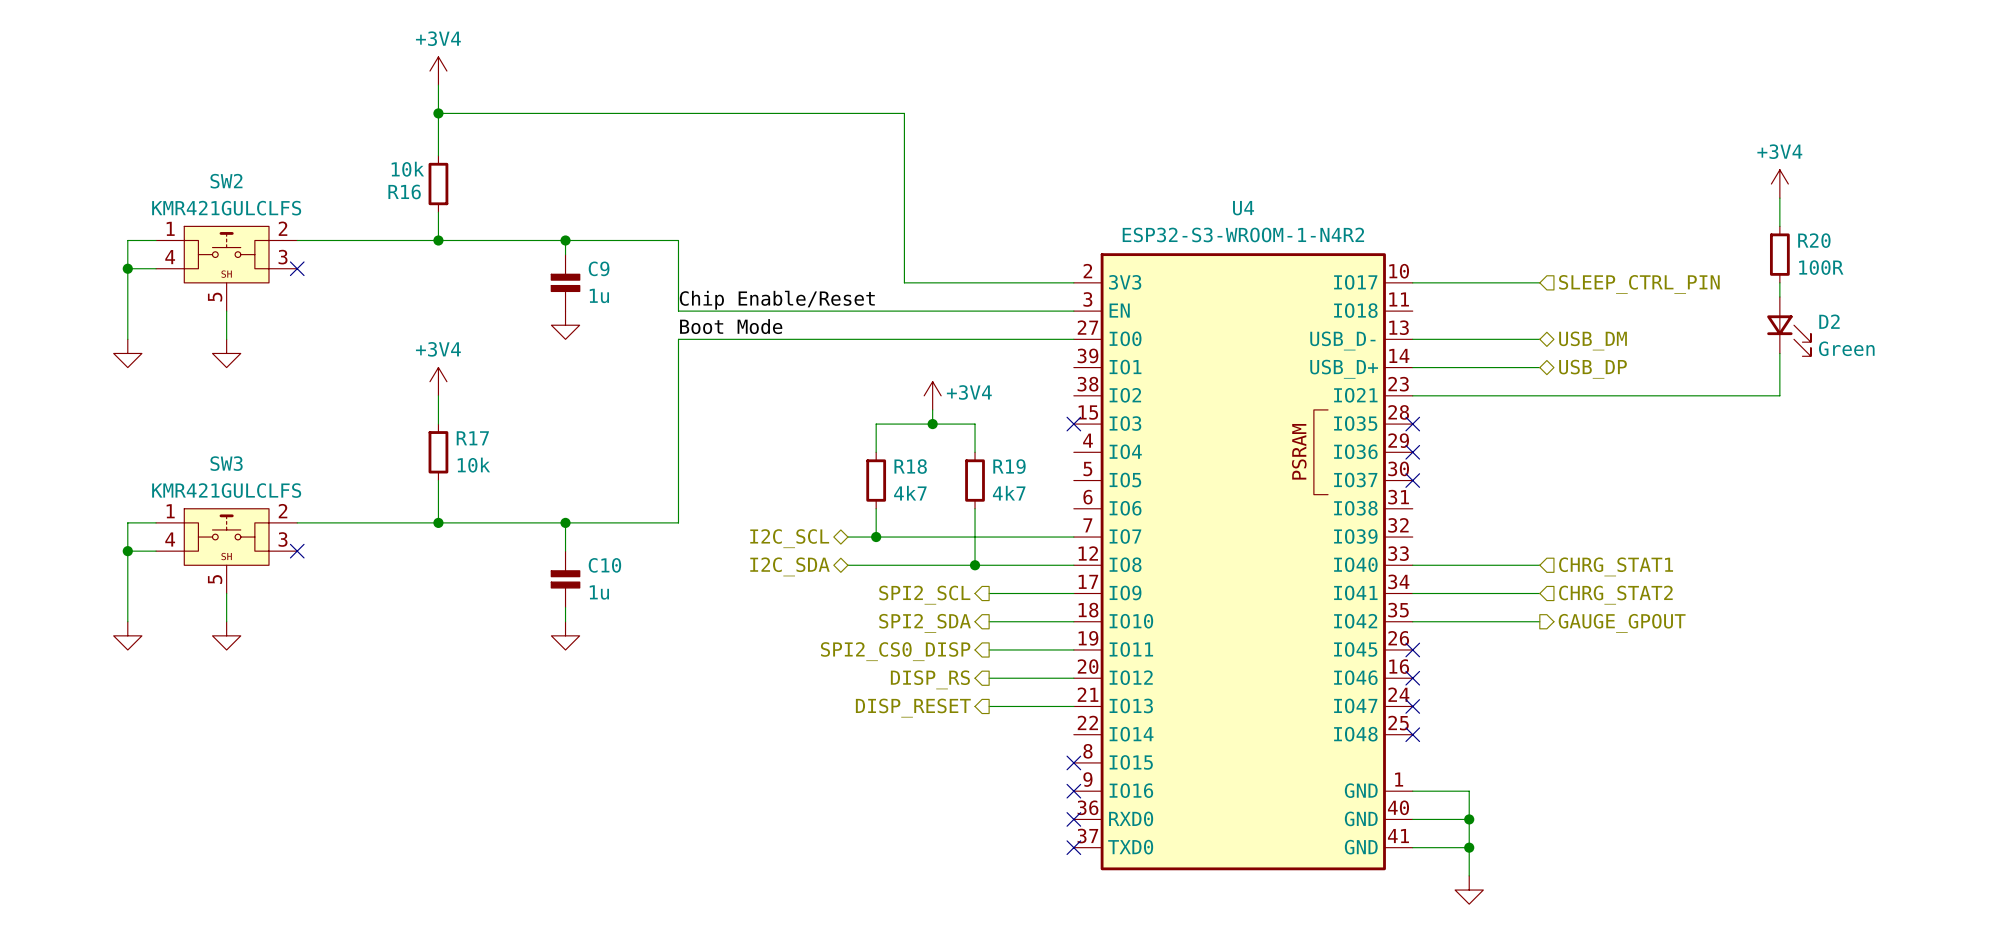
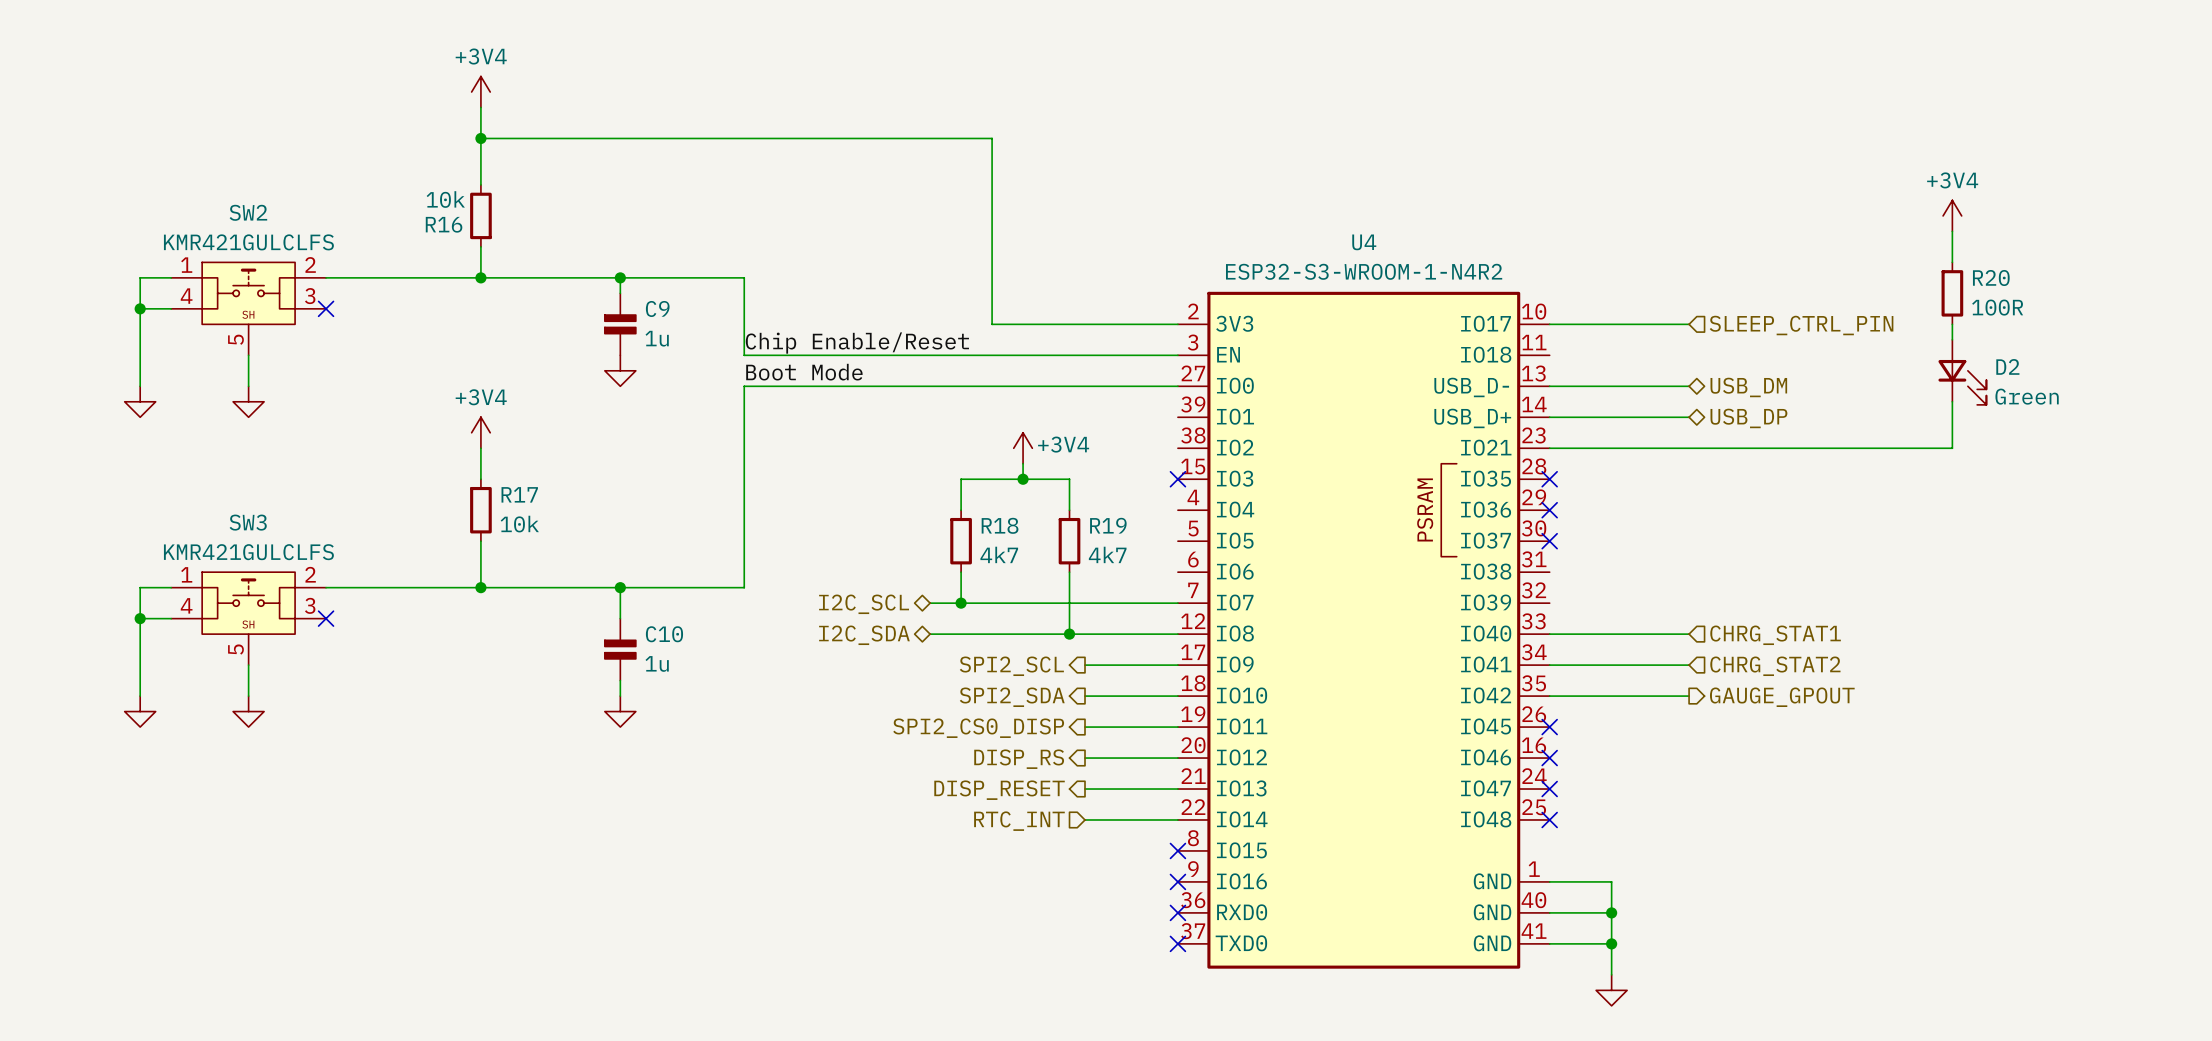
wire: none -> (1085, 819) (1177, 819)
hierarchical label: none -> RTC_INT (1019, 821)

